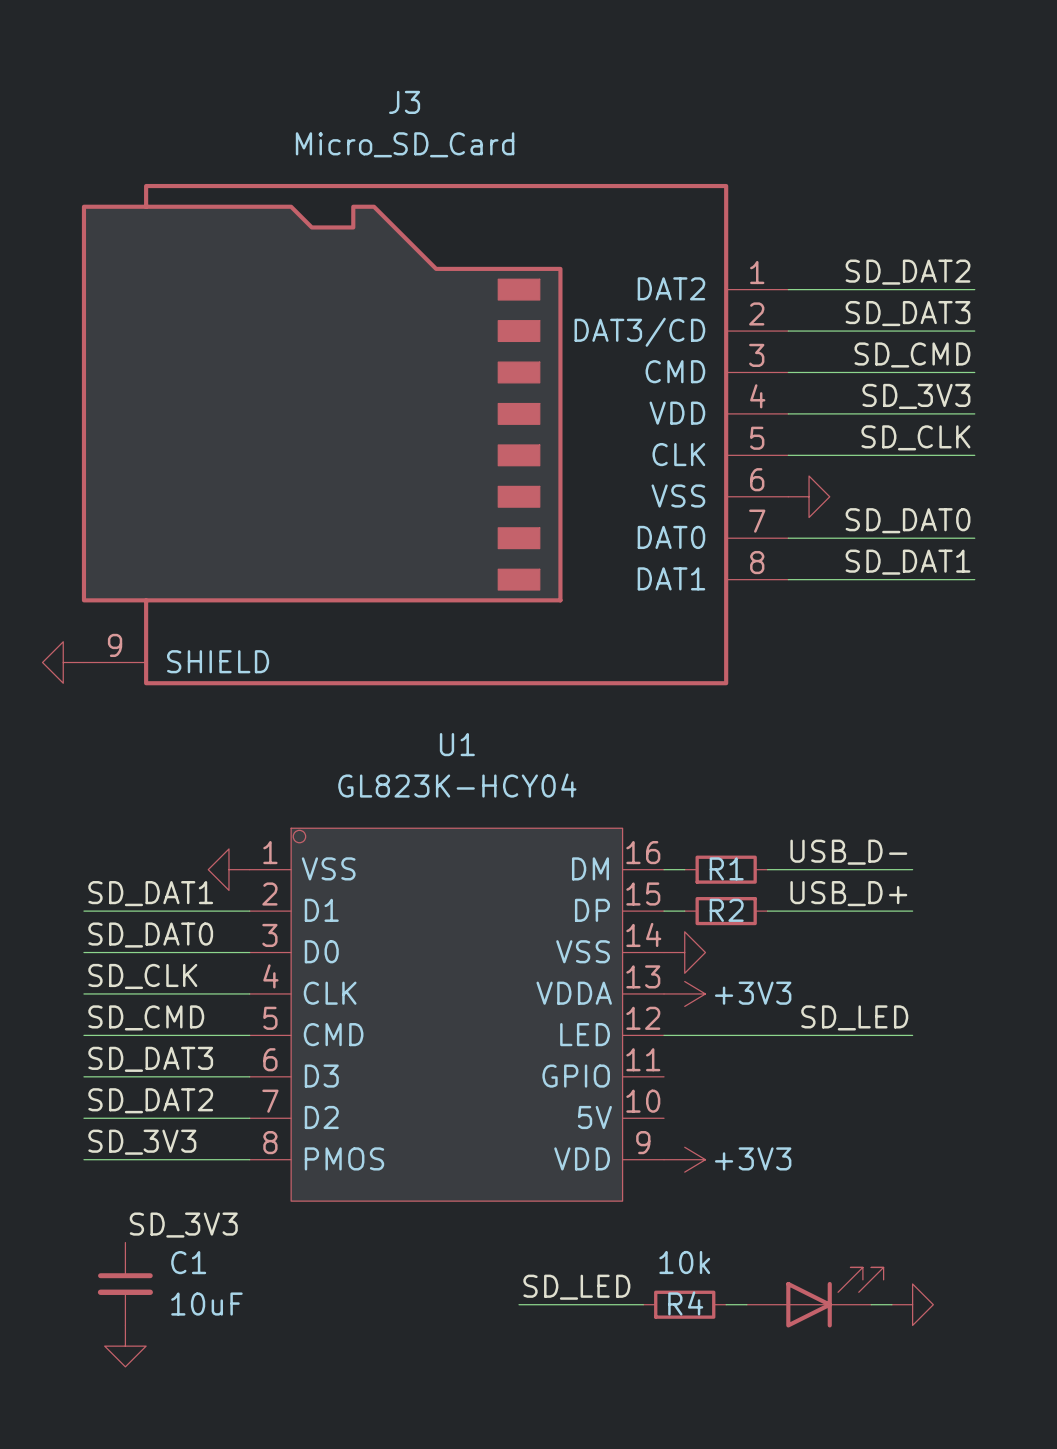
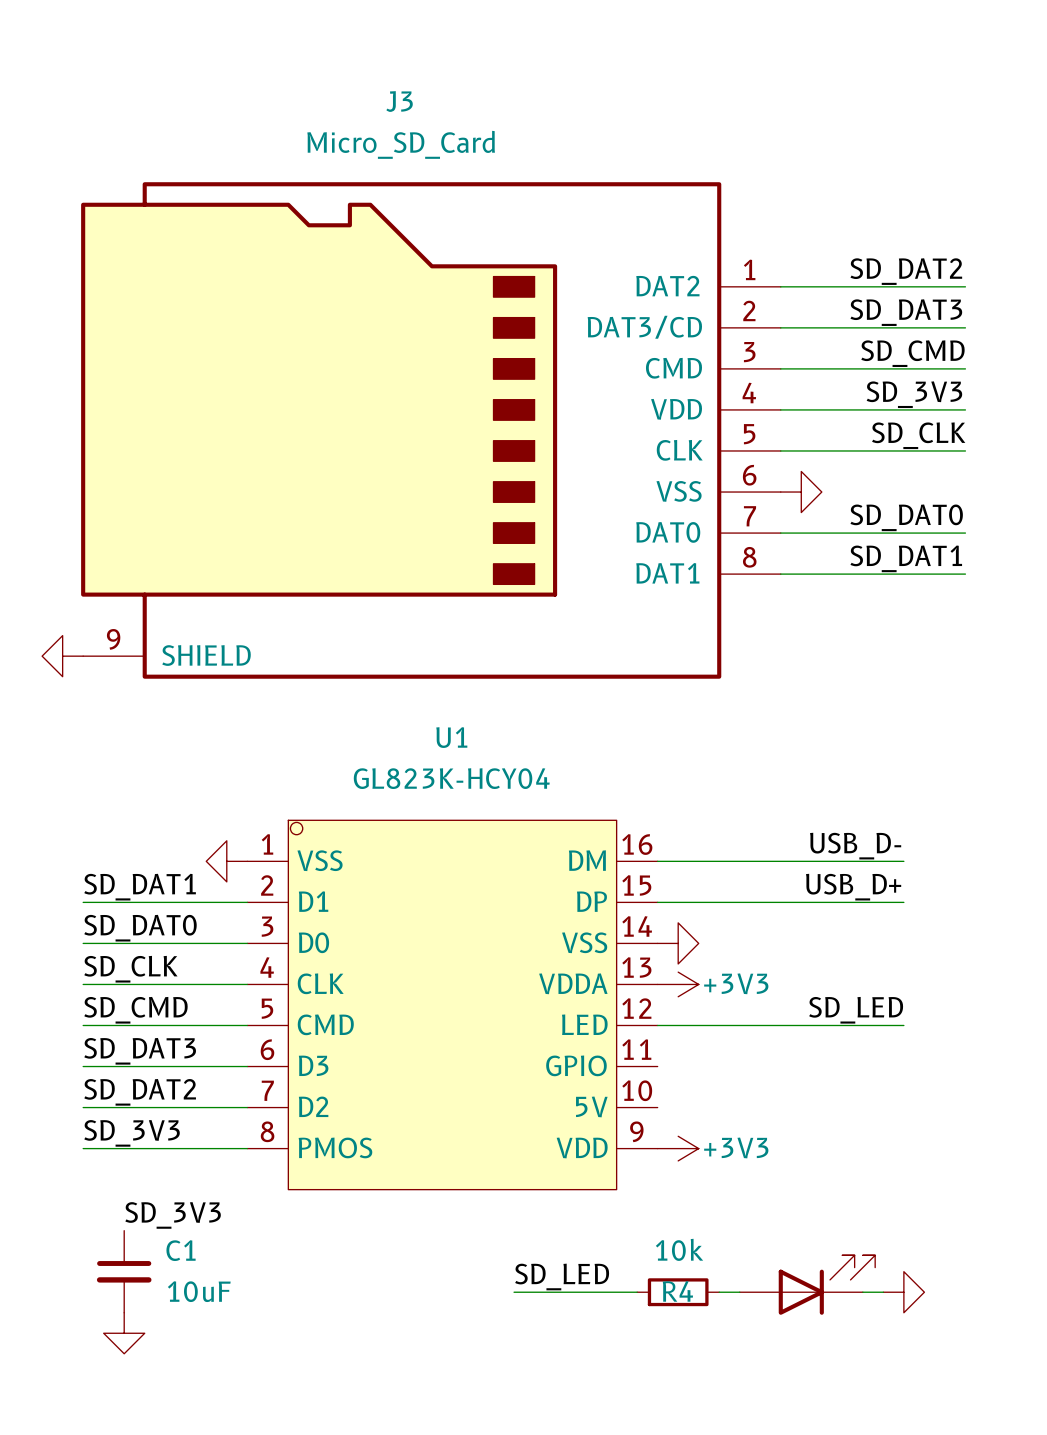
wire: none -> (678, 861) (760, 861)
R1: (726, 869) -> none
wire: none -> (678, 902) (760, 902)
R2: (726, 911) -> none

